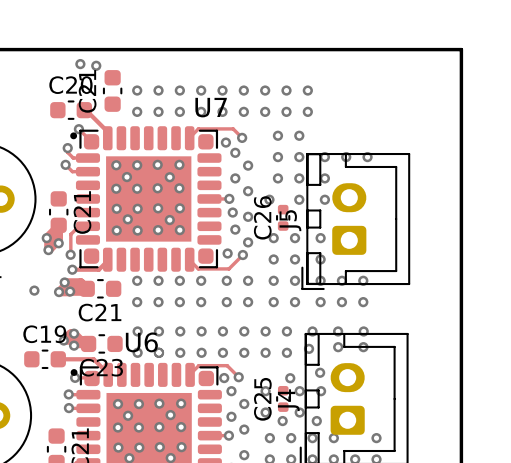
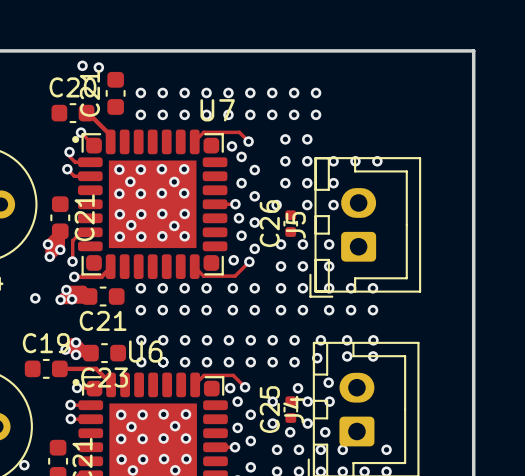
via: none -> (24, 465)

